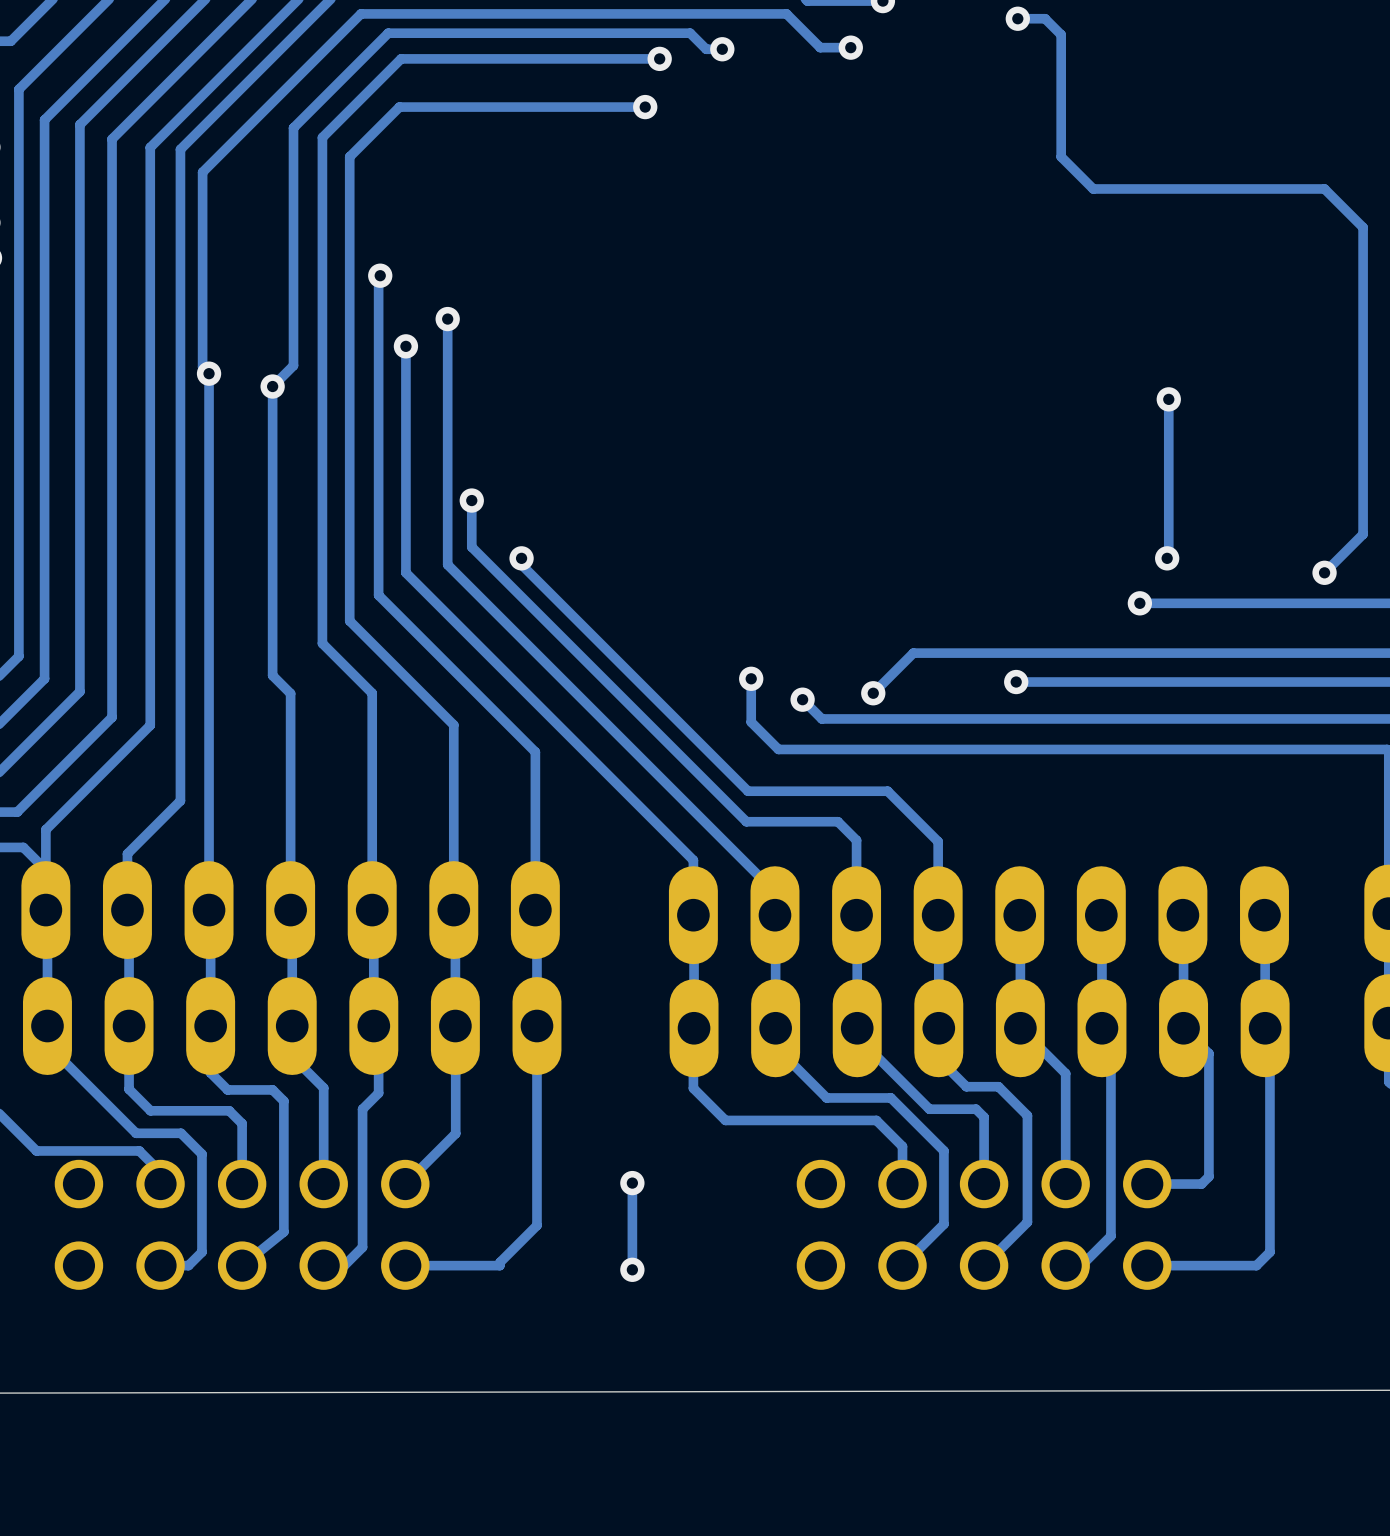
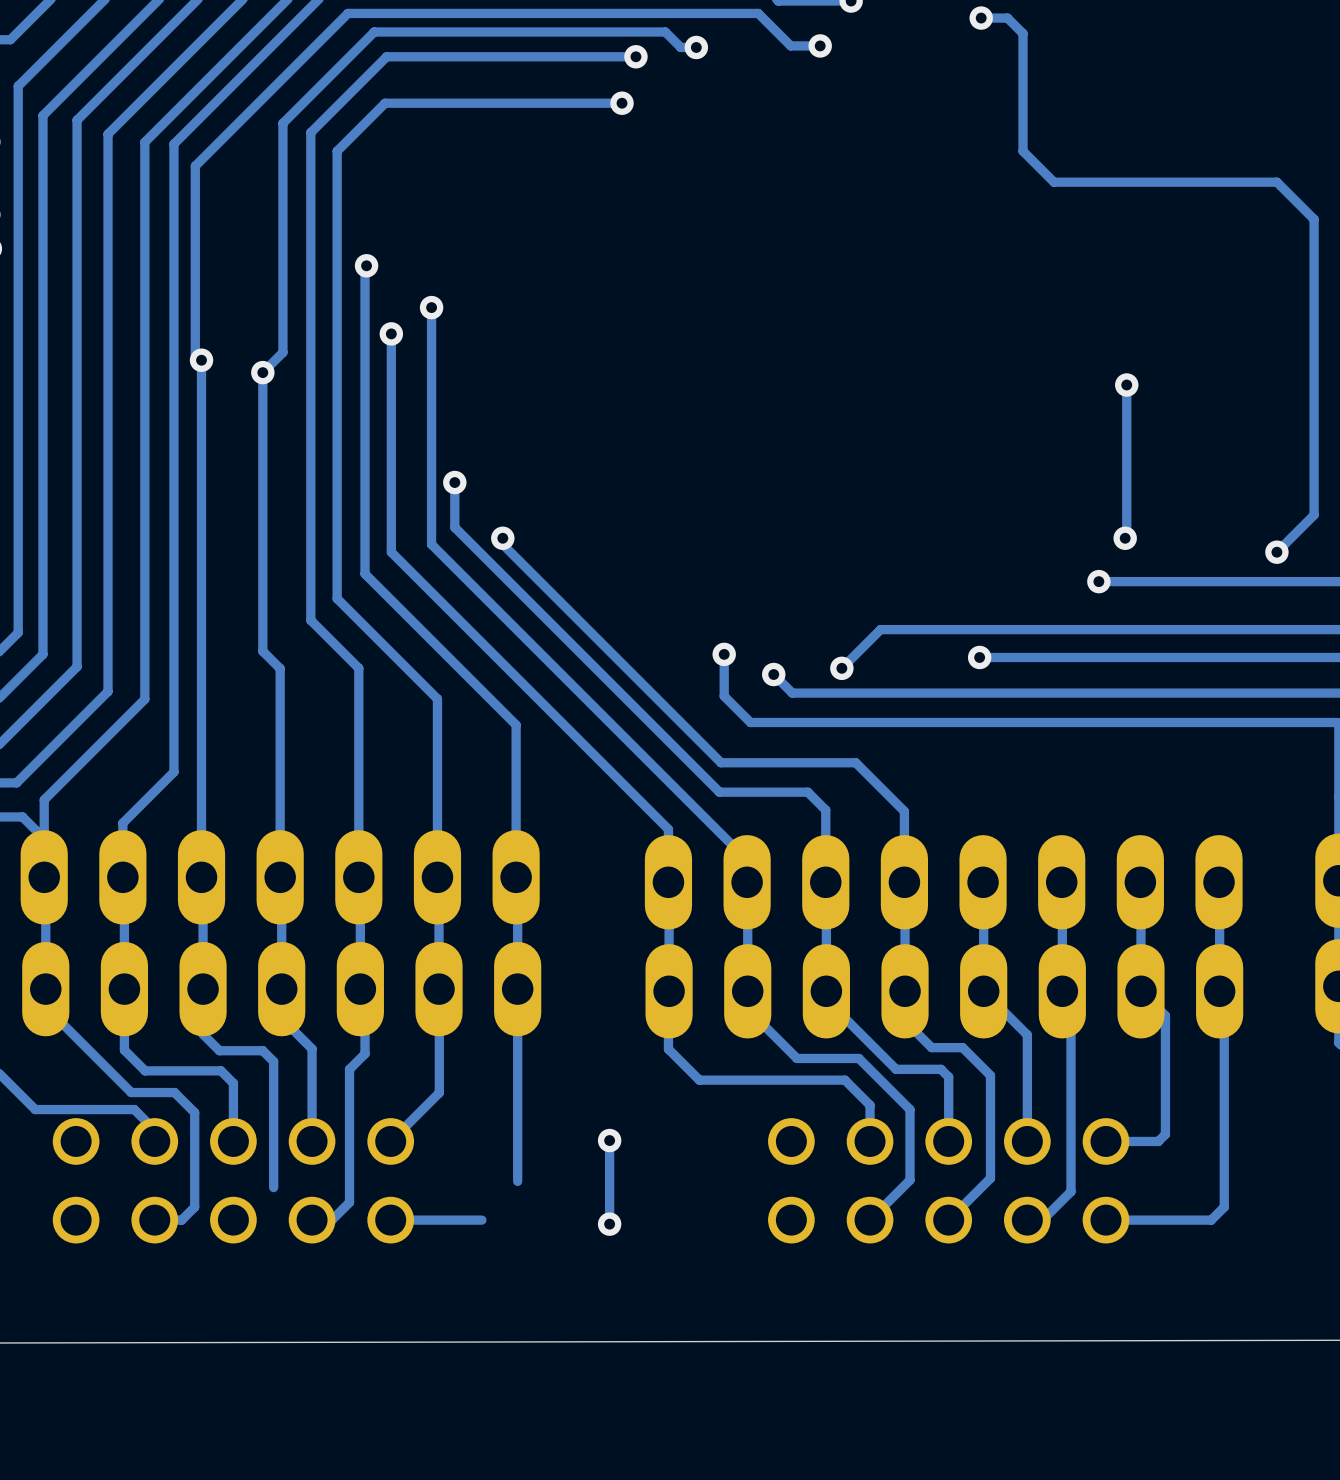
track: (536, 1225) (500, 1262) (499, 1265) -> none
track: (283, 1231) (242, 1265) -> none

